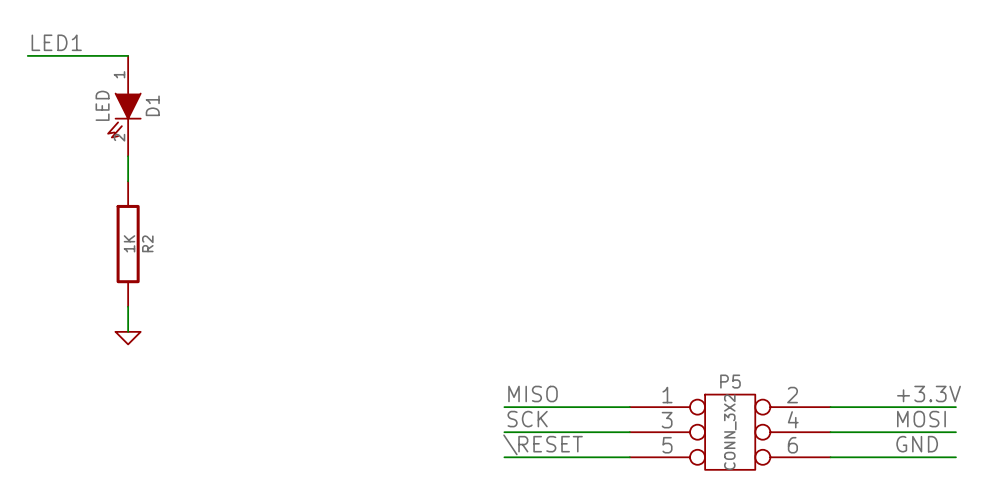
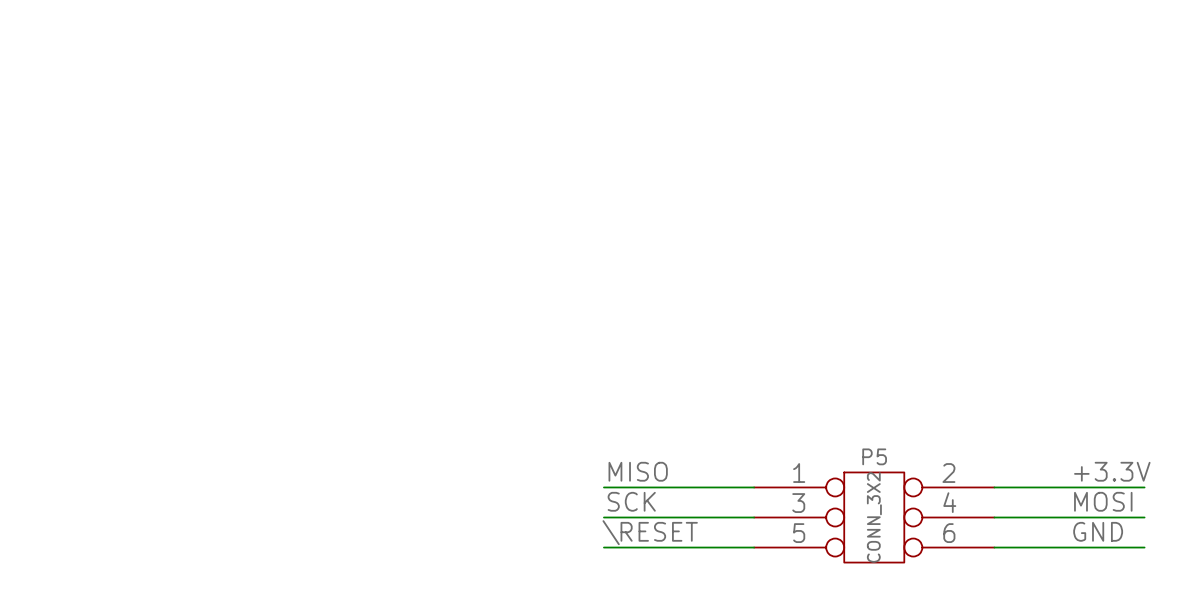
label: LED1 (56, 42) -> none
wire: (27, 55) (128, 55) -> none
D1: LED (124, 106) -> none
wire: (128, 156) (128, 181) -> none
R2: 1K (128, 244) -> none
wire: (128, 306) (128, 331) -> none
power symbol: (128, 338) -> none

